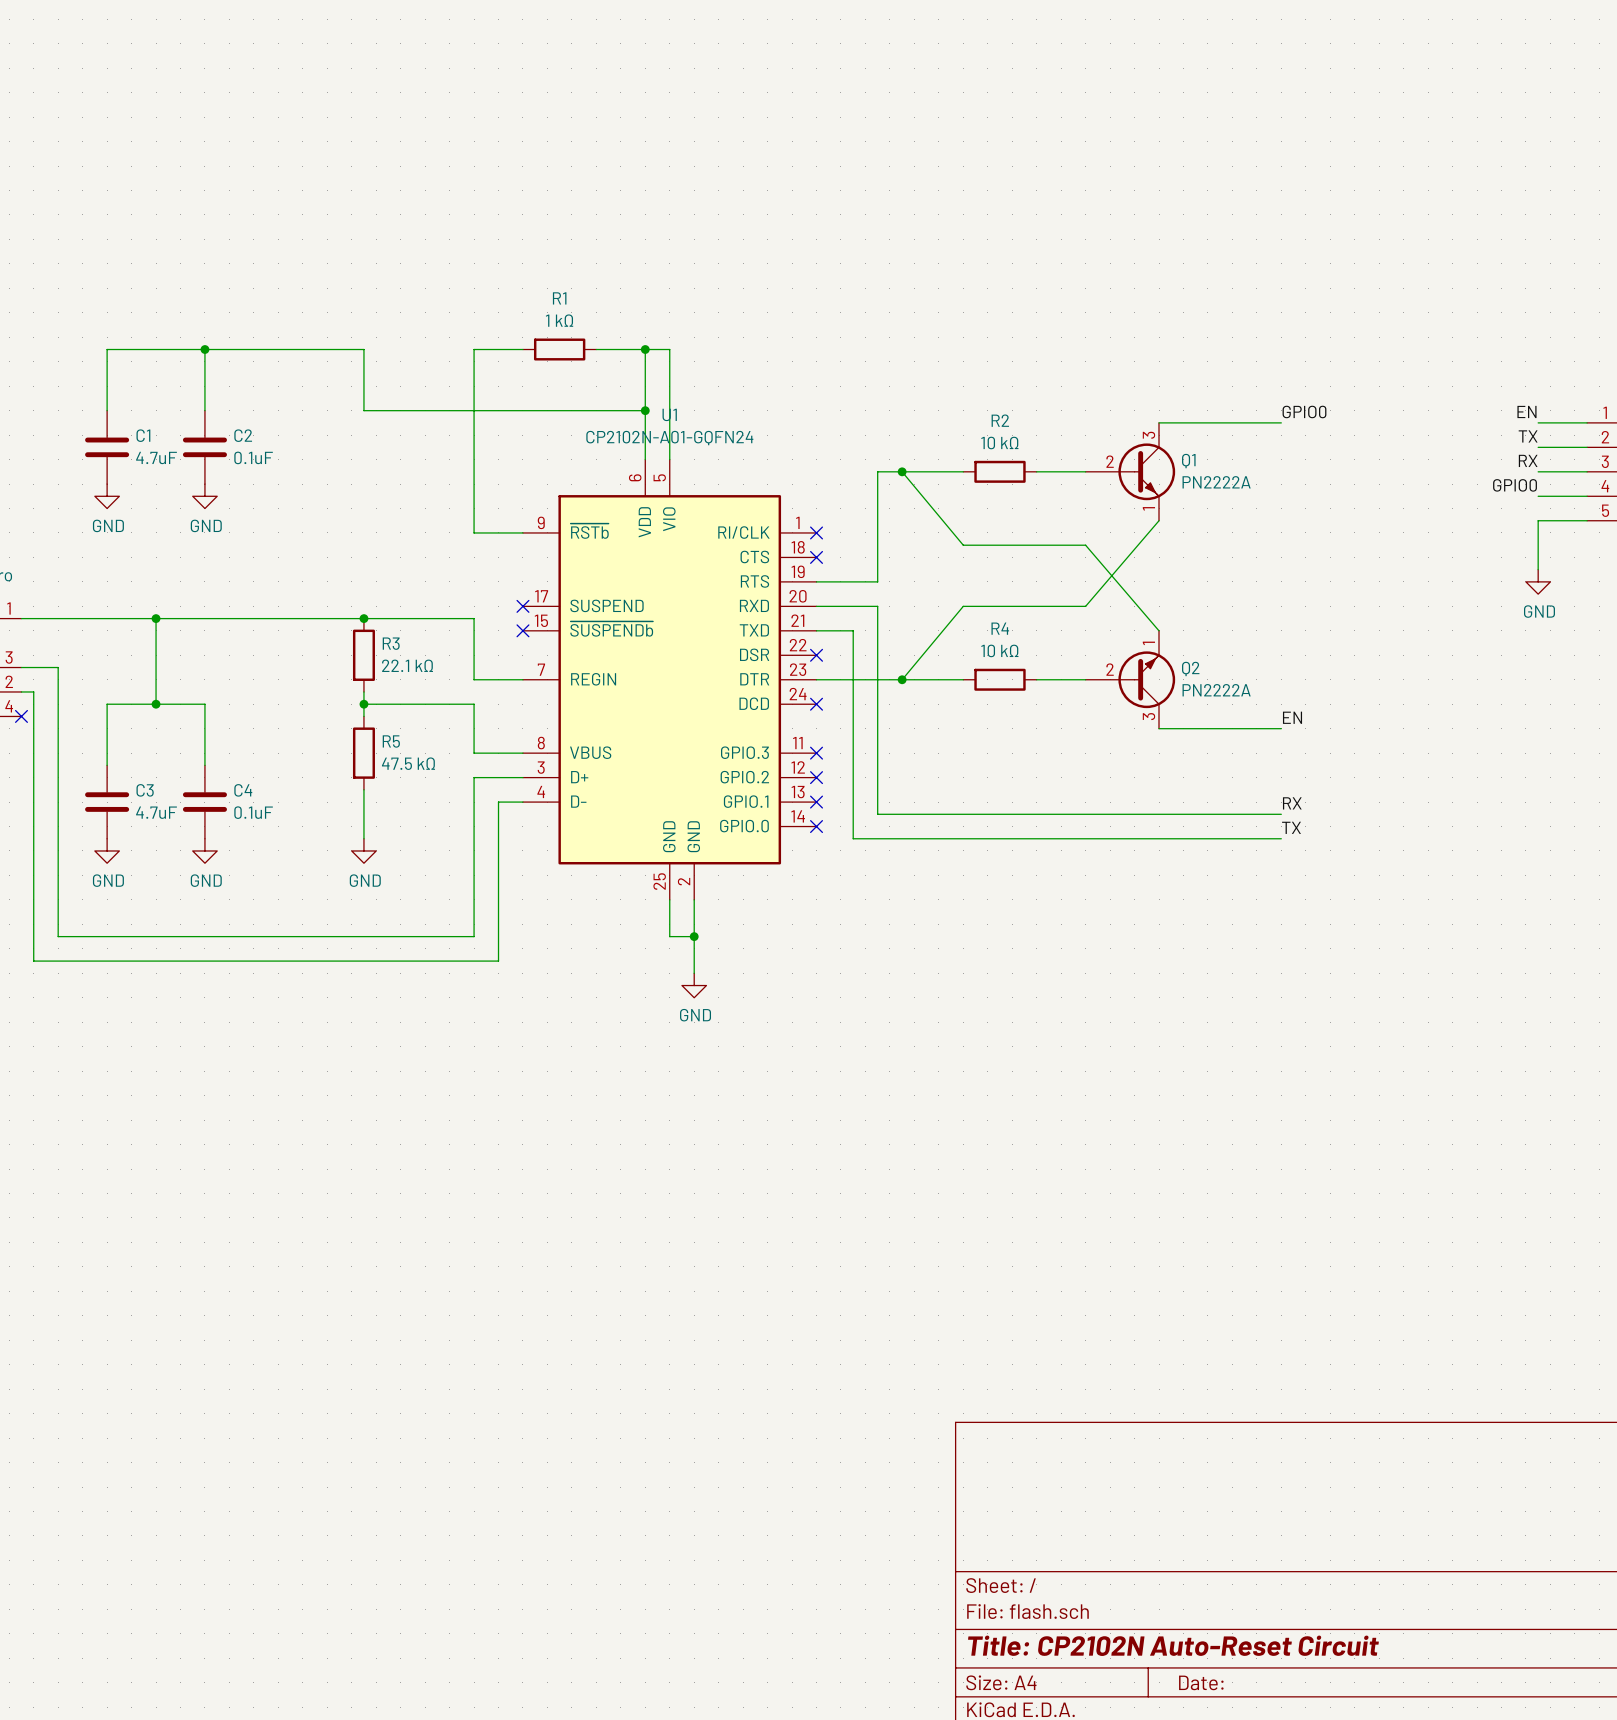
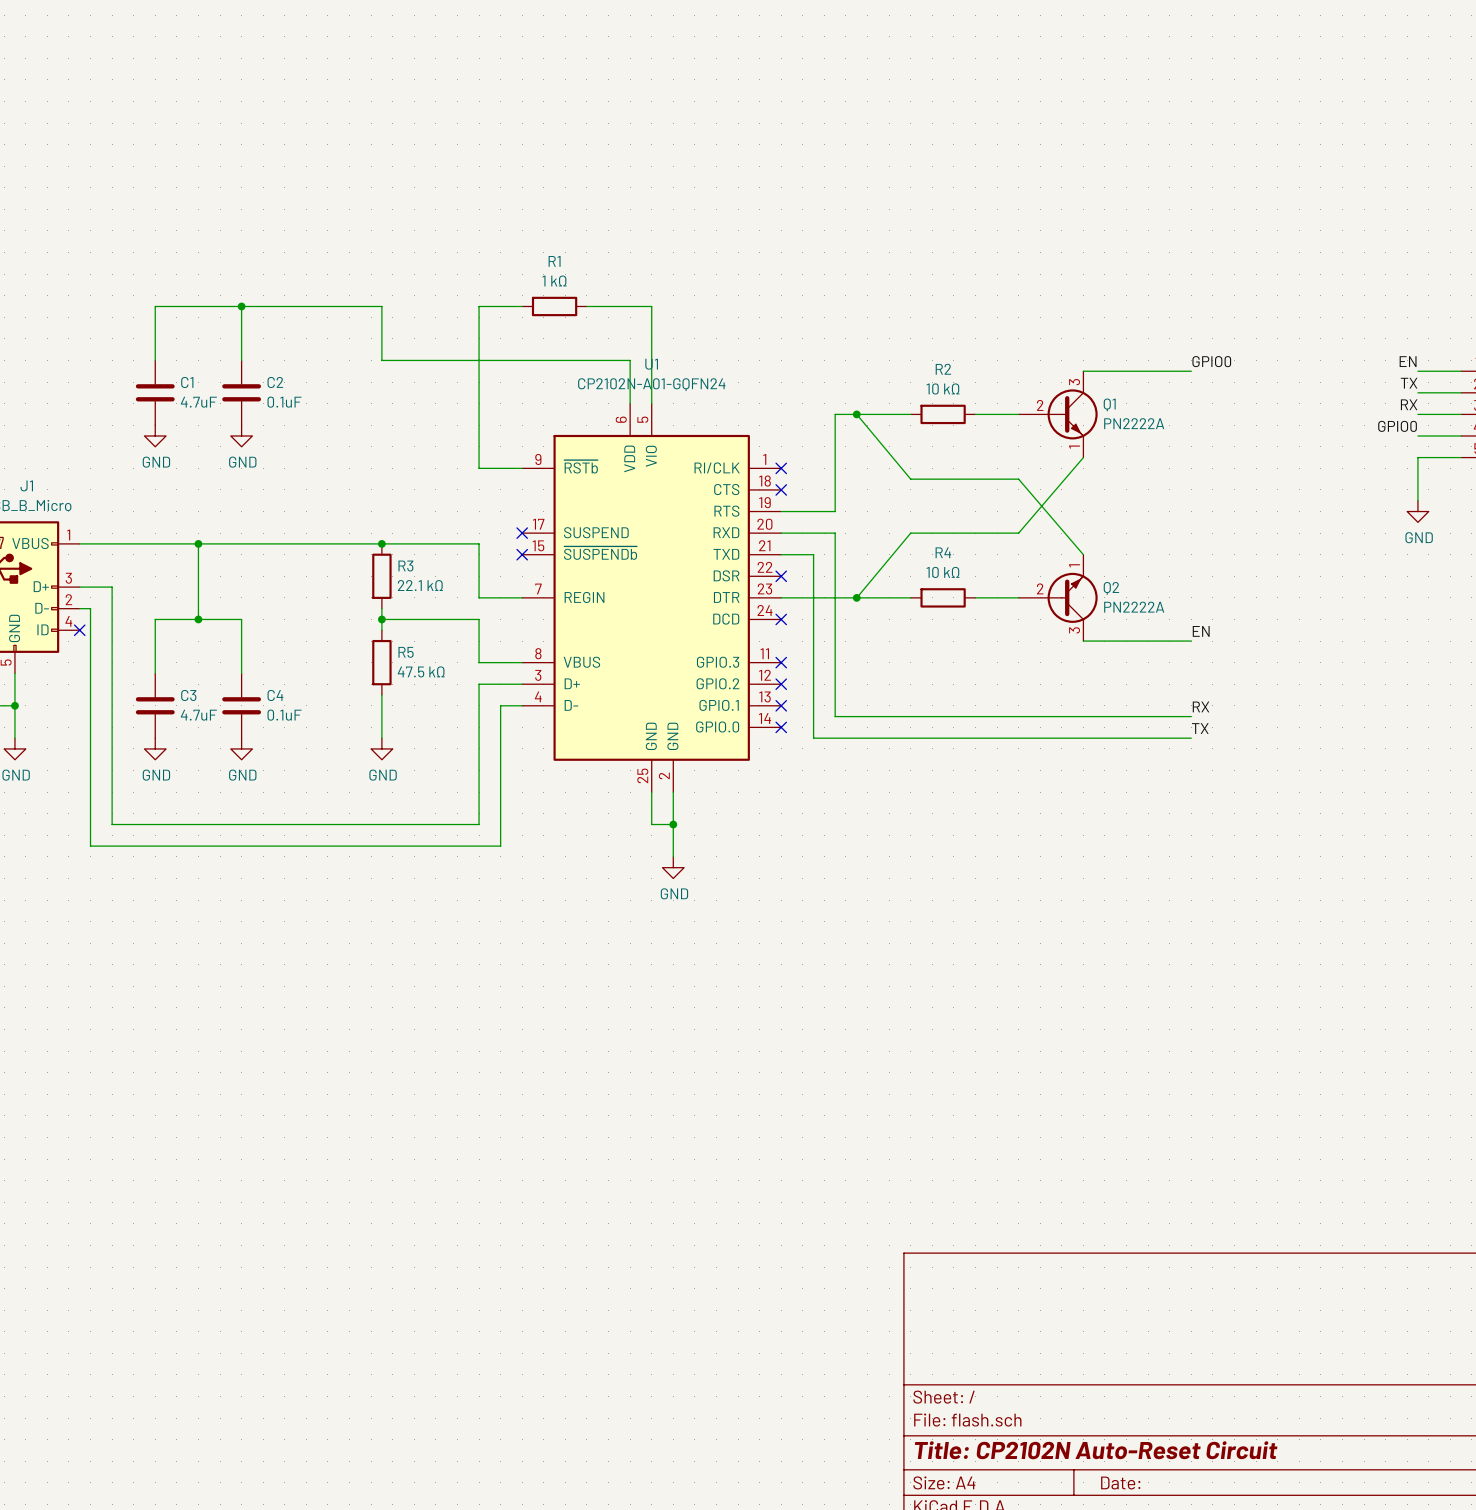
wire: (645, 349) (645, 410) -> none
junction: (645, 349) -> none
junction: (645, 410) -> none

